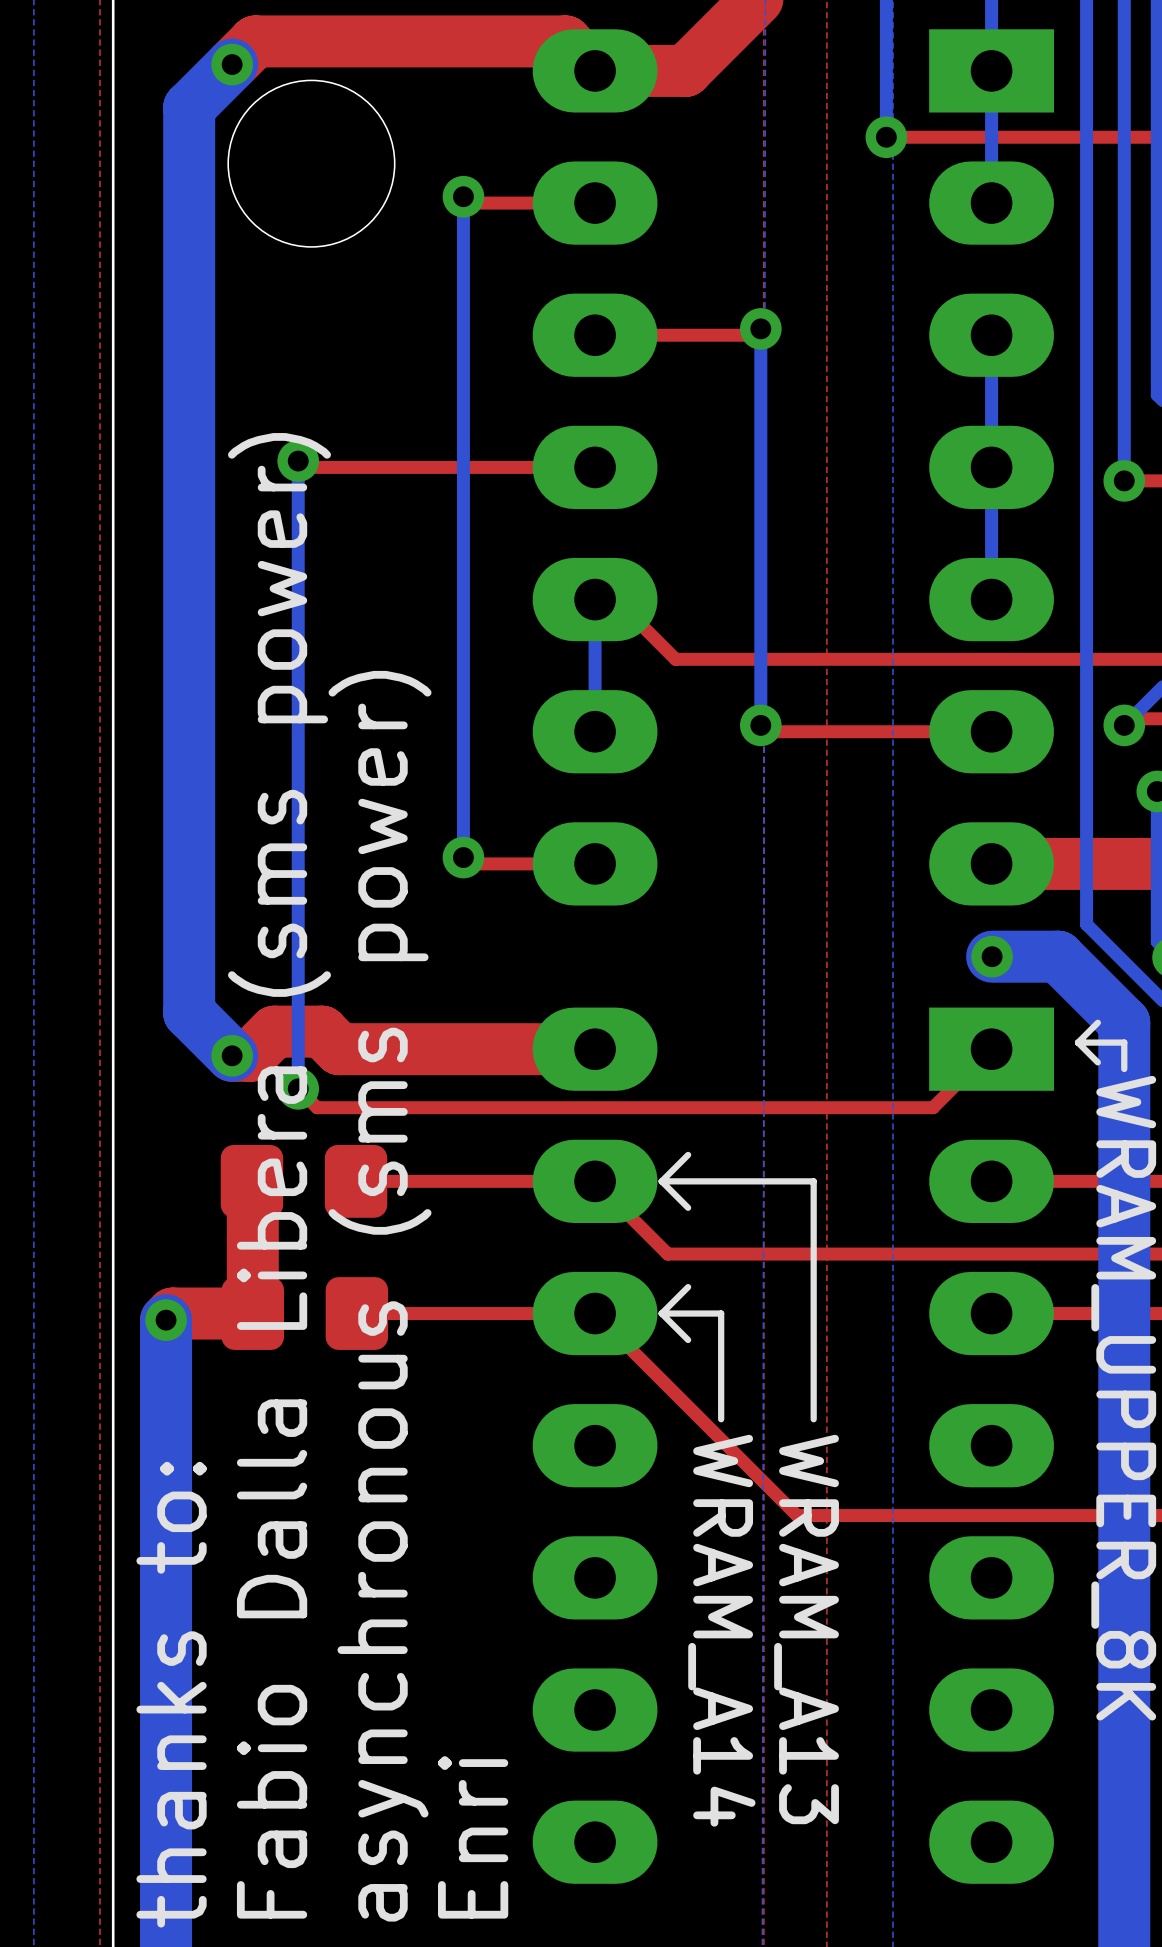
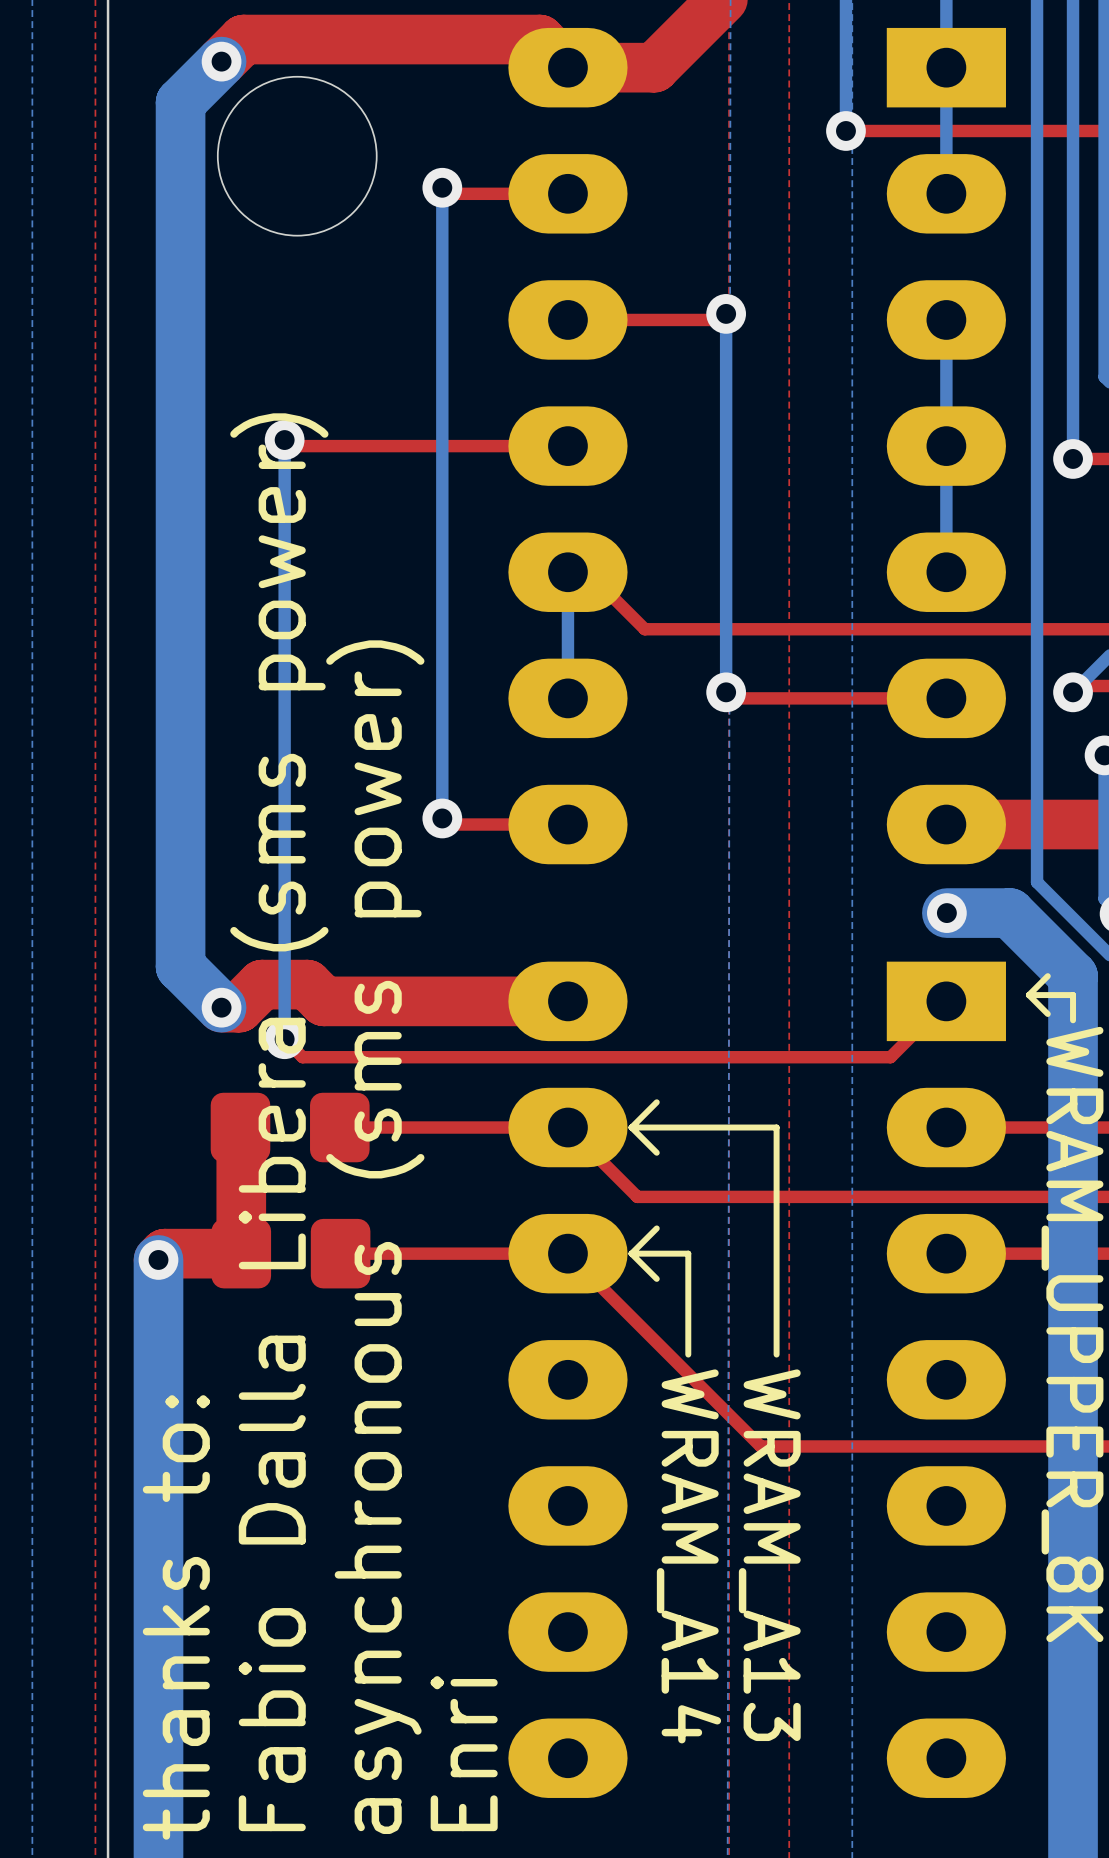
text position: Fabio Dalla Libera (sms power) (279, 1175) -> Fabio Dalla Libera (sms power) (279, 1122)
text position: asynchronous (sms power) (380, 1296) -> asynchronous (sms power) (375, 1237)
text position: thanks to: (171, 1694) -> thanks to: (176, 1617)
text position: Enri (473, 1837) -> Enri (464, 1753)

